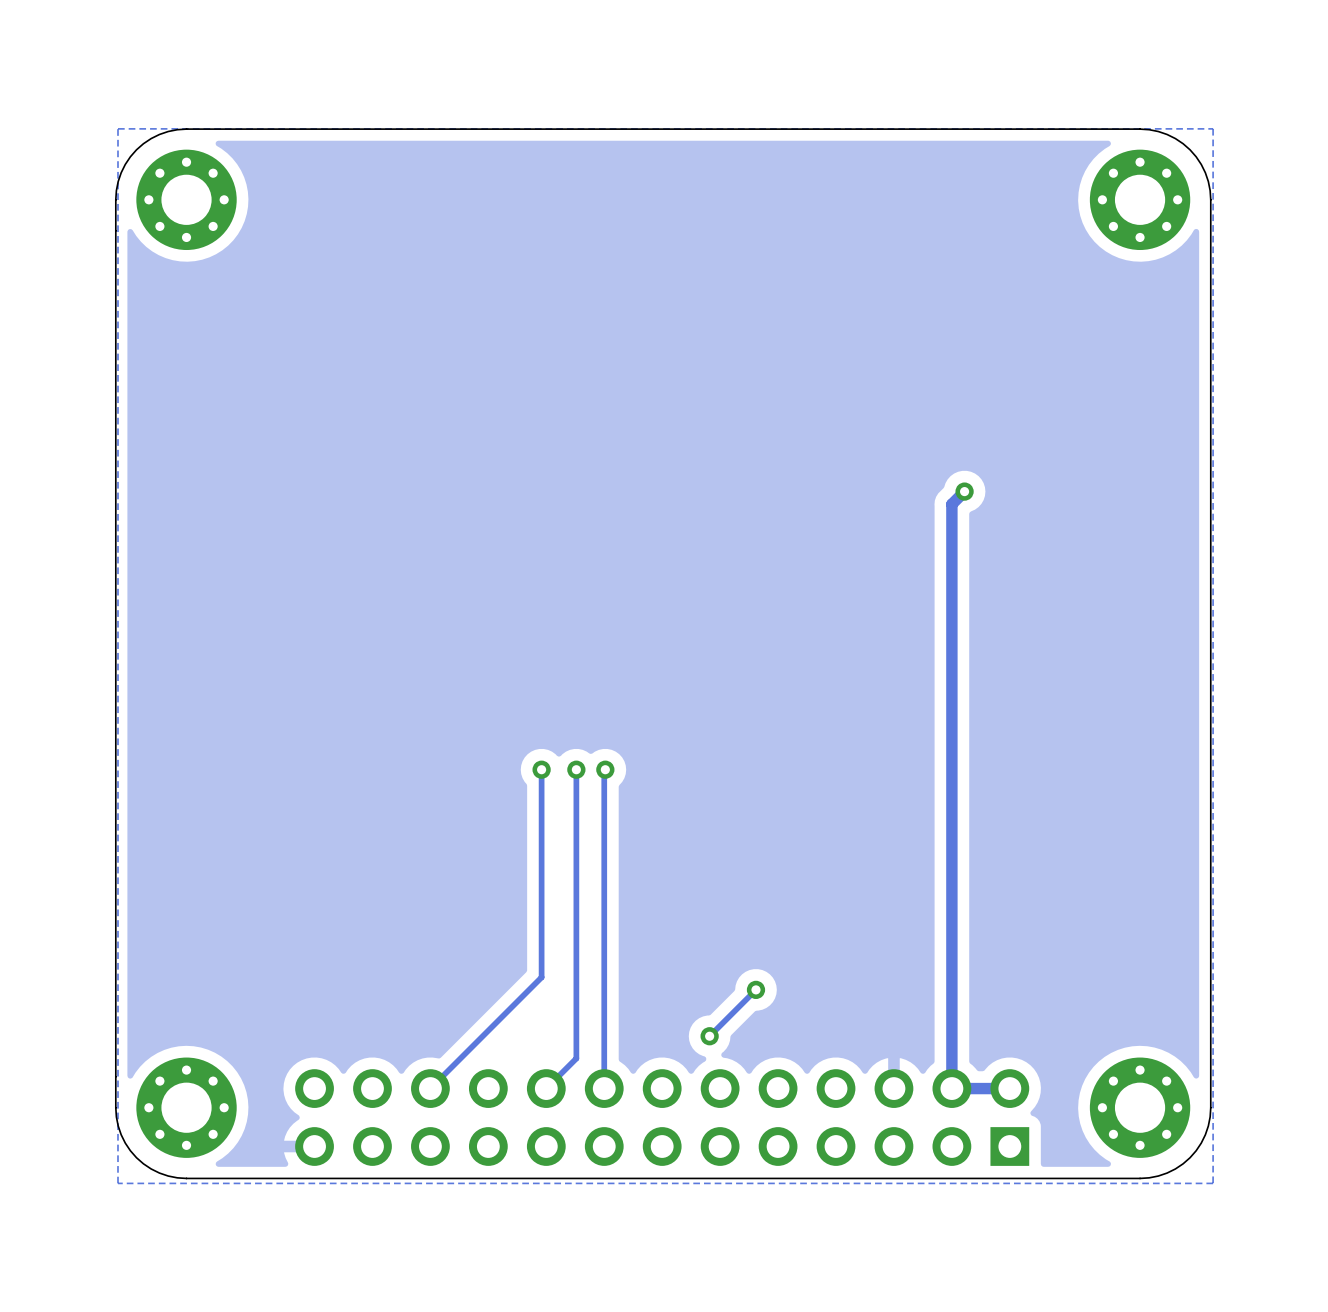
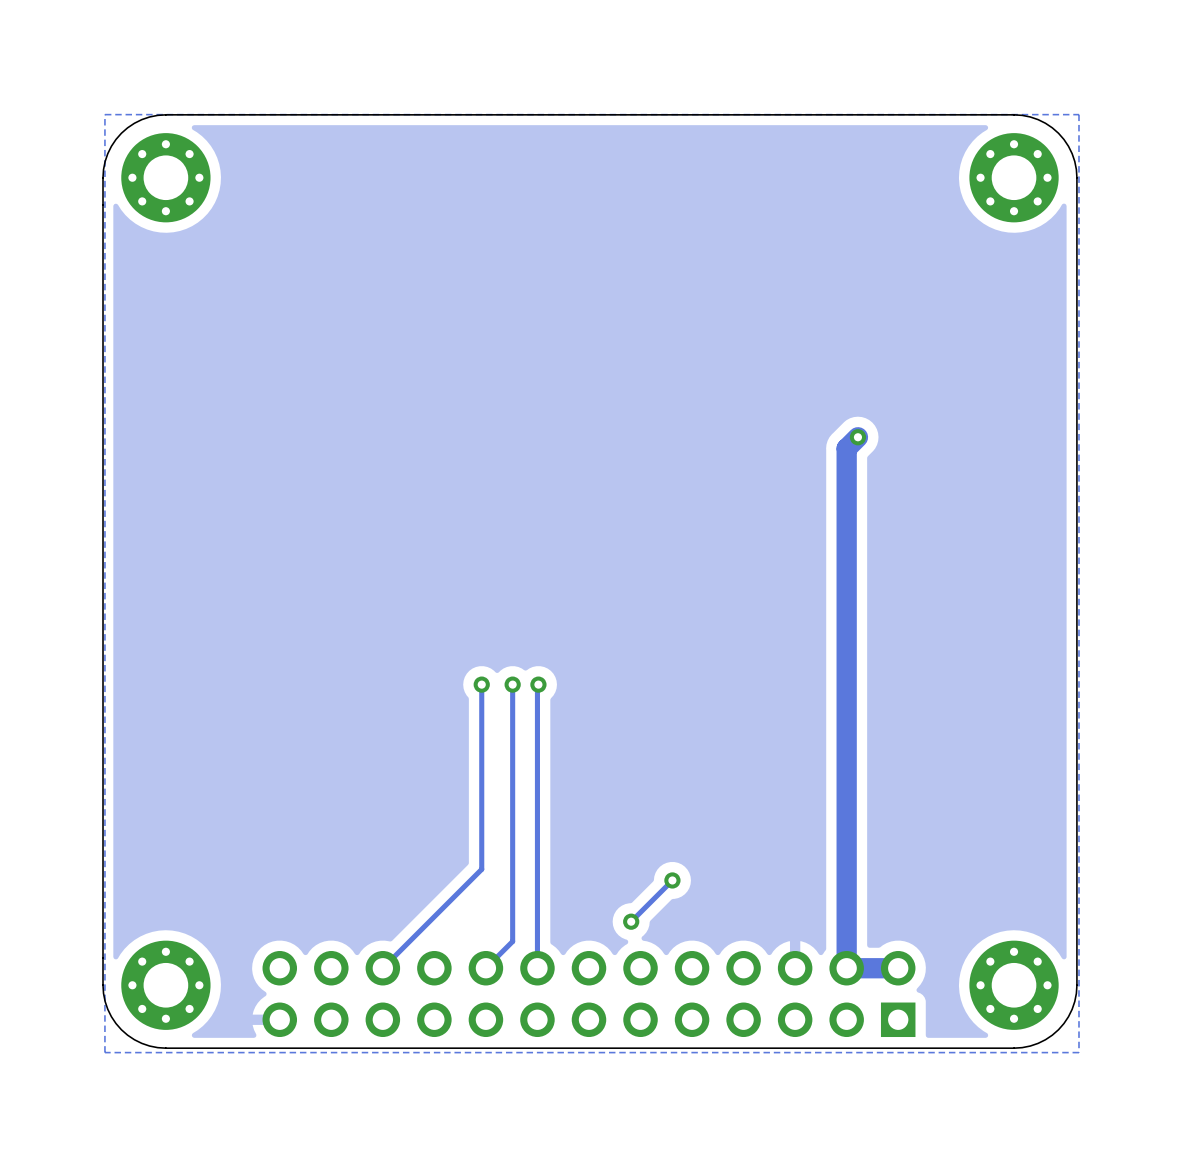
track width: thin (964, 491) (951, 504) (951, 1088) (1009, 1088) -> thick (857, 437) (846, 448) (846, 968) (898, 968)

